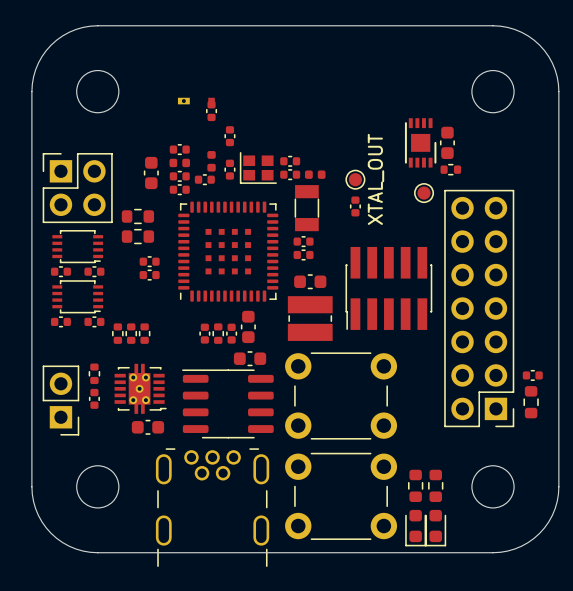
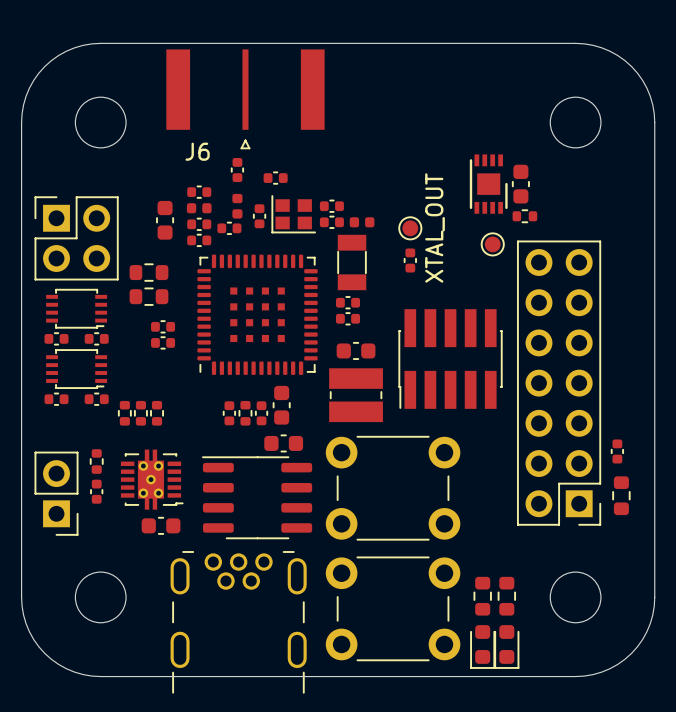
J6: none -> (245, 99)
part: (196, 101) -> none
part: (211, 111) -> none
part: none -> (237, 170)
part: (229, 136) -> none
part: none -> (275, 178)
part rotation: 0° (532, 375) -> 90° clockwise (617, 451)

